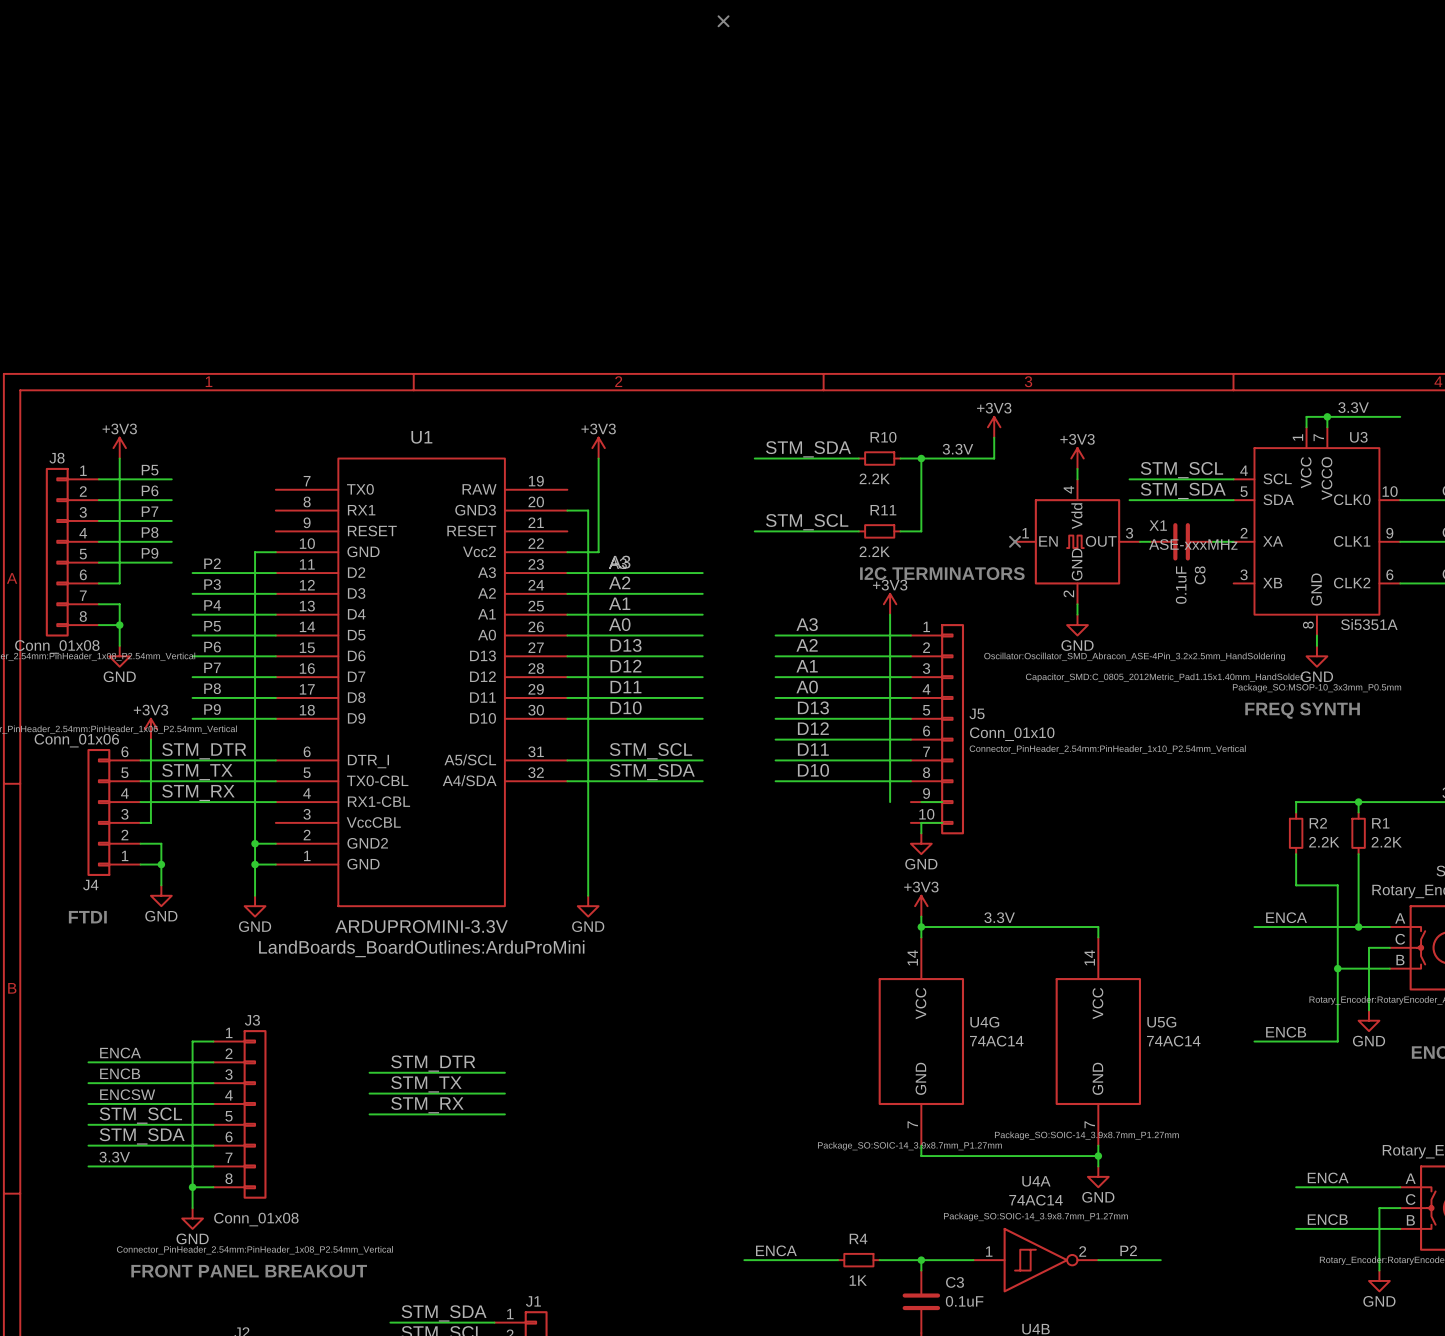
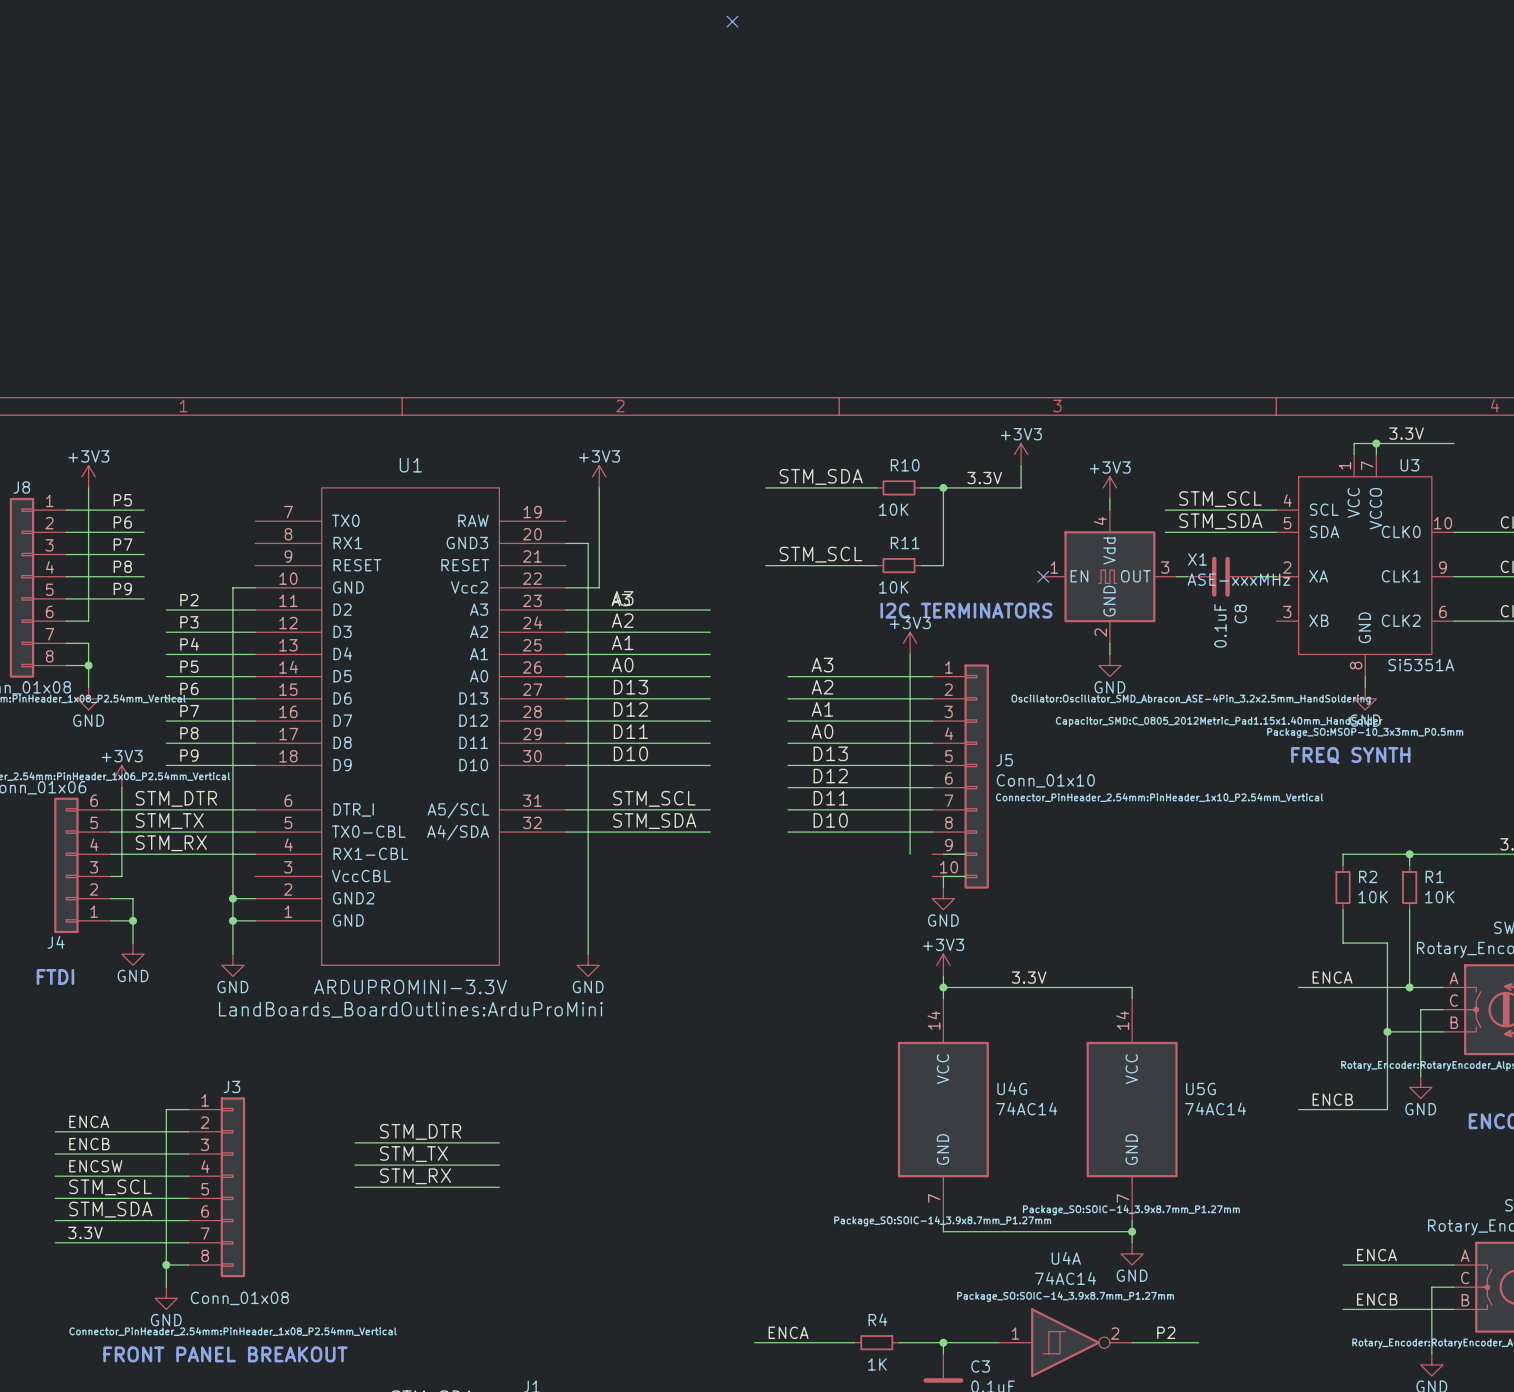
R10 value: 2.2K (874, 478) -> 10K (893, 509)
R11 value: 2.2K (874, 551) -> 10K (893, 587)
R2 value: 2.2K (1324, 842) -> 10K (1373, 897)
R1 value: 2.2K (1386, 842) -> 10K (1439, 897)

